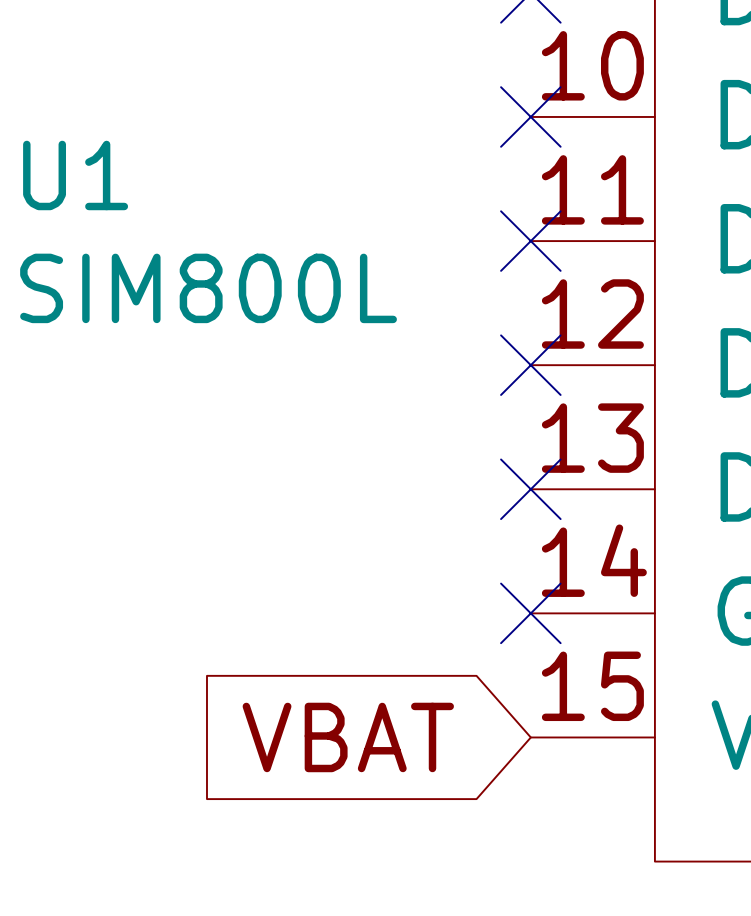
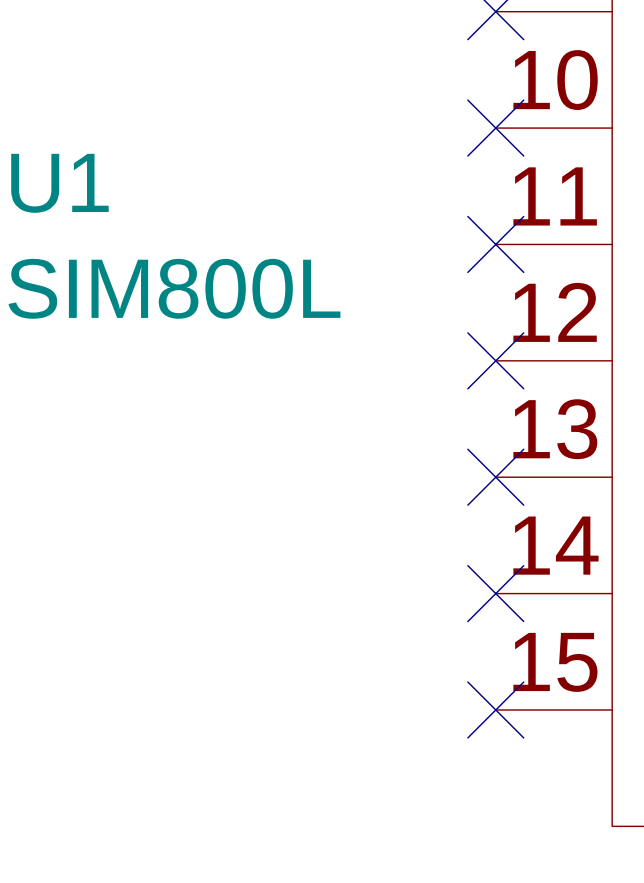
global label: VBAT (348, 737) -> none
no-connect mark: none -> (495, 709)

